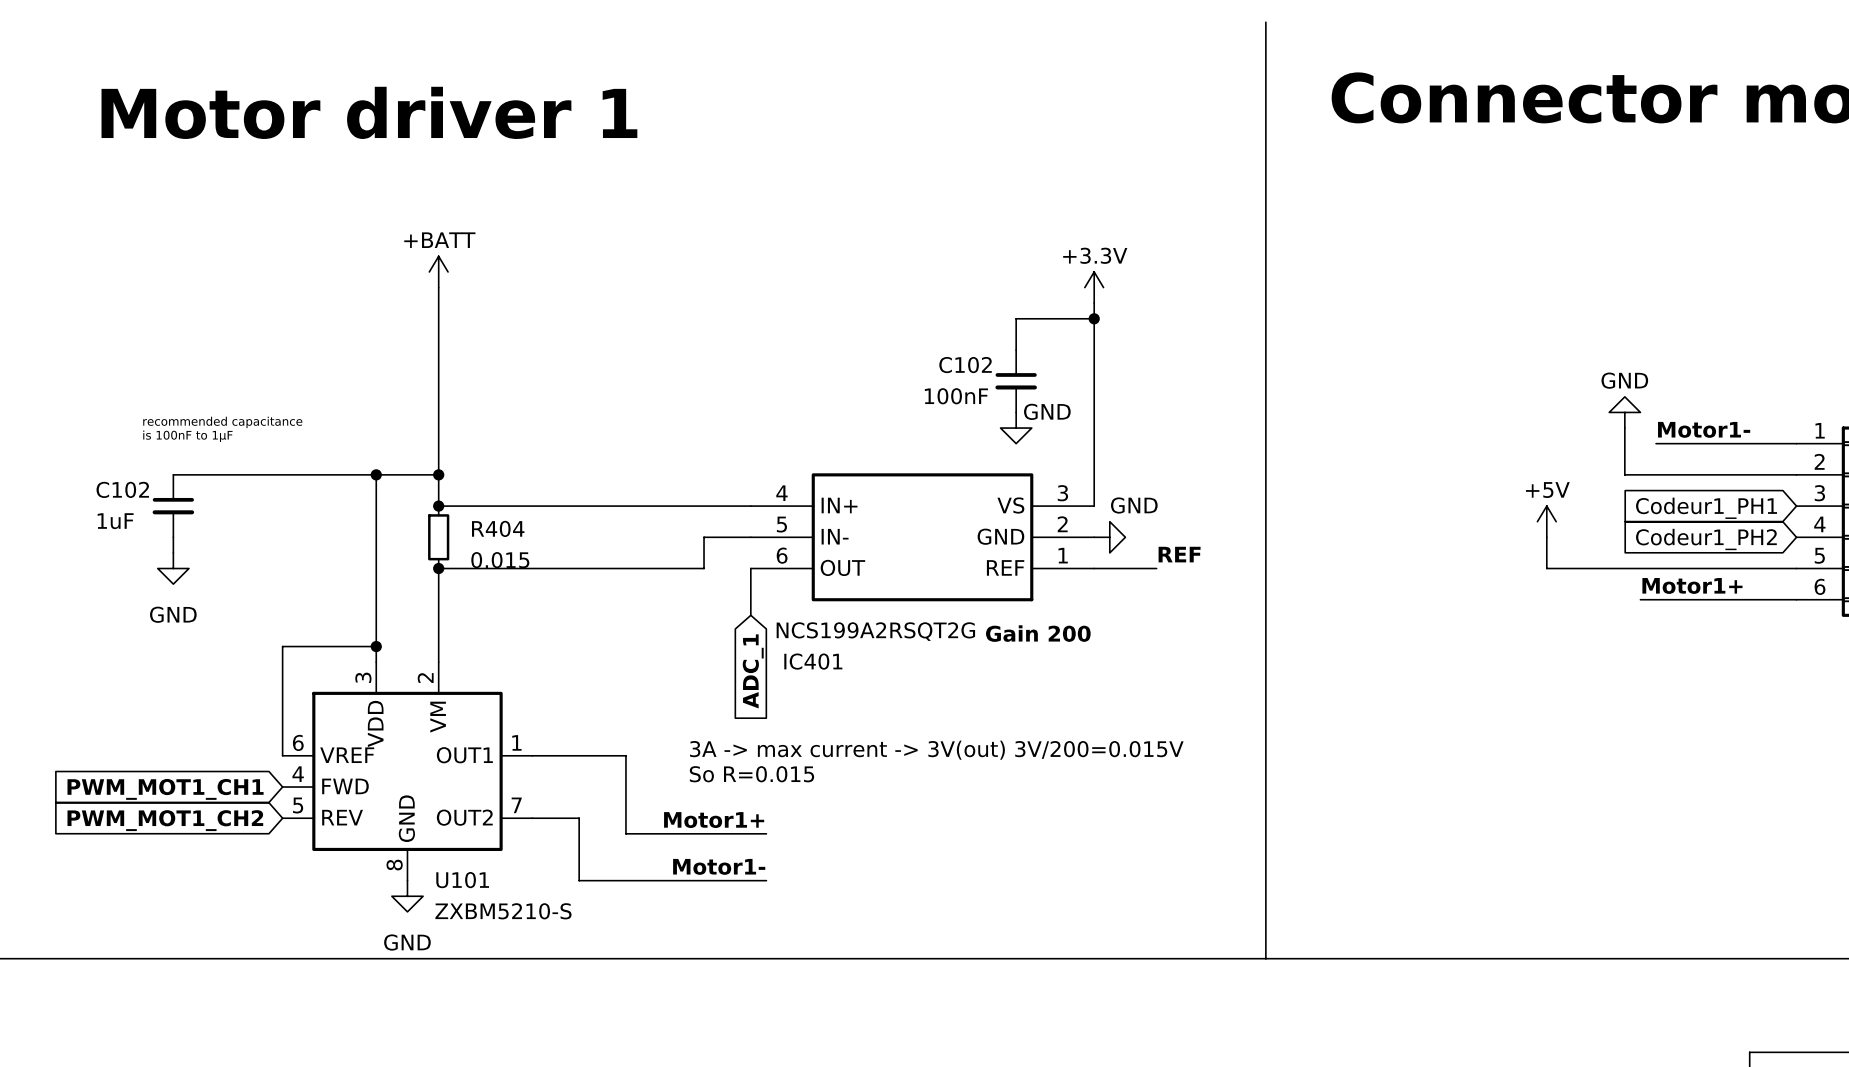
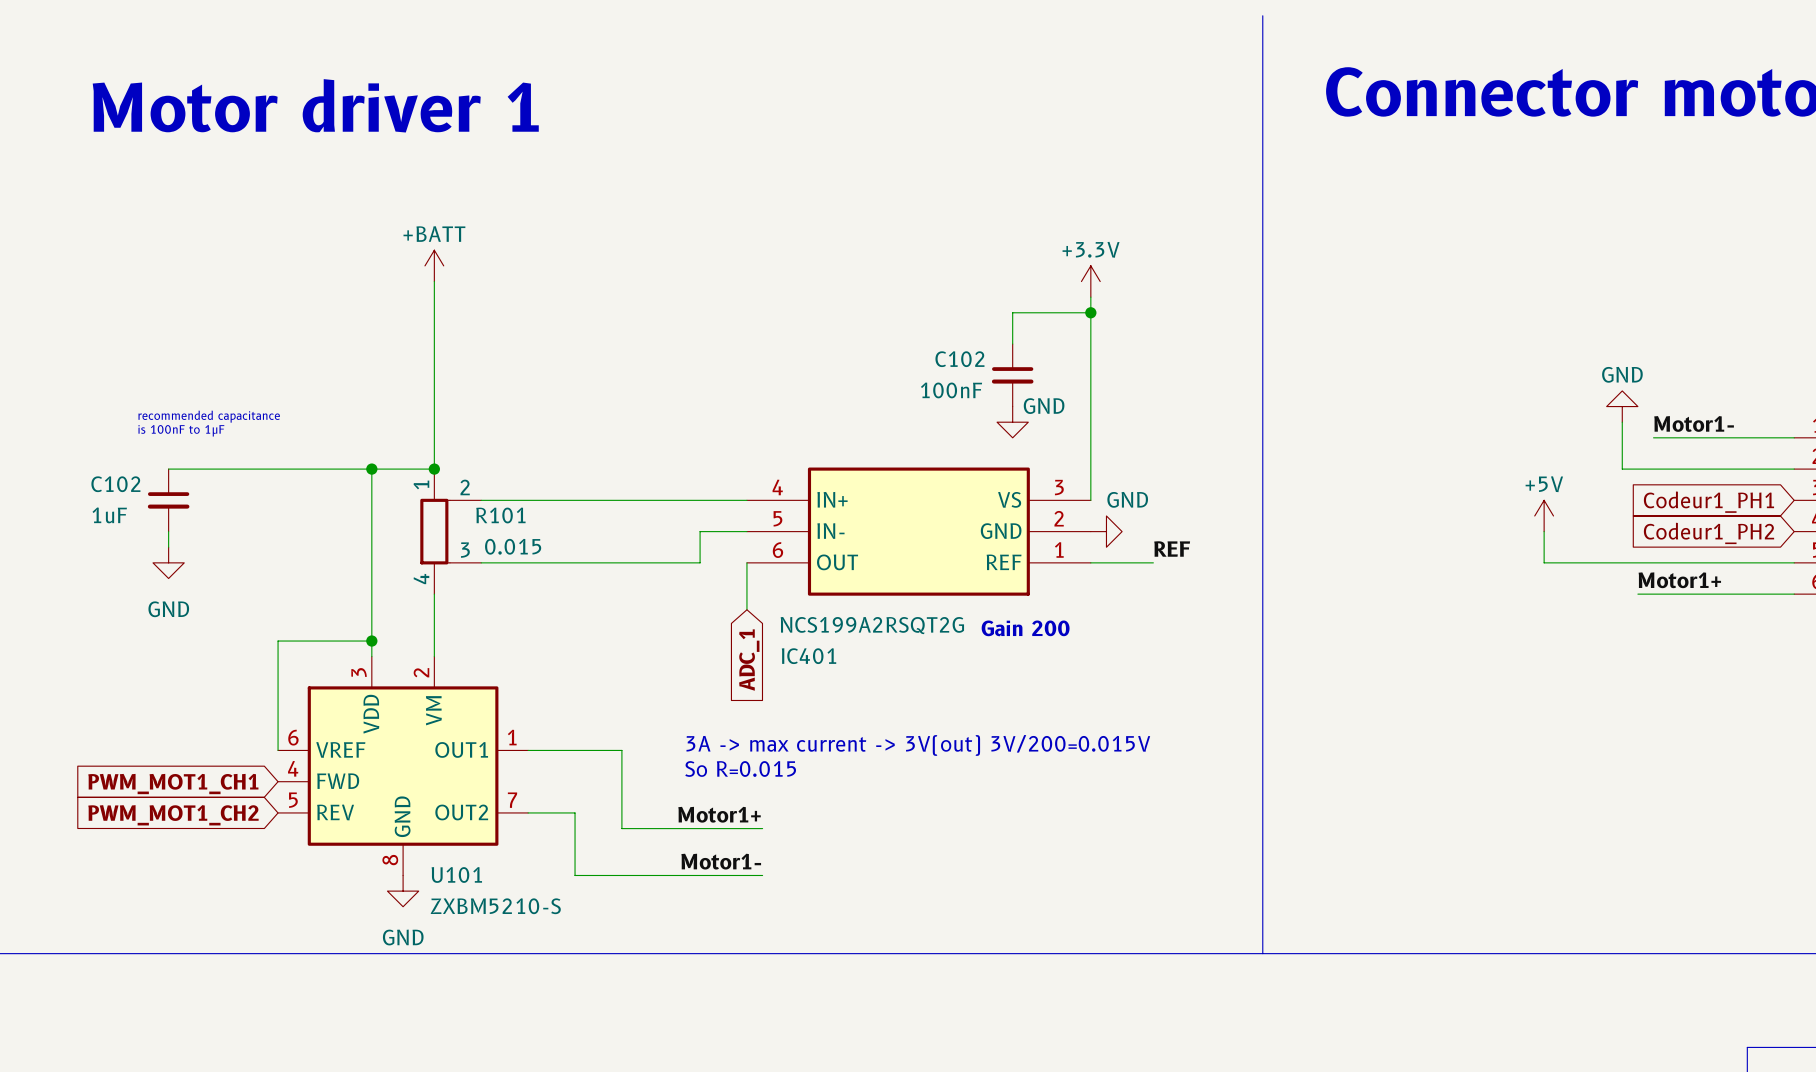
junction: (438, 506) -> none
R404: 0.015 (438, 537) -> none
R101: none -> 0.015 (450, 531)
junction: (438, 568) -> none

